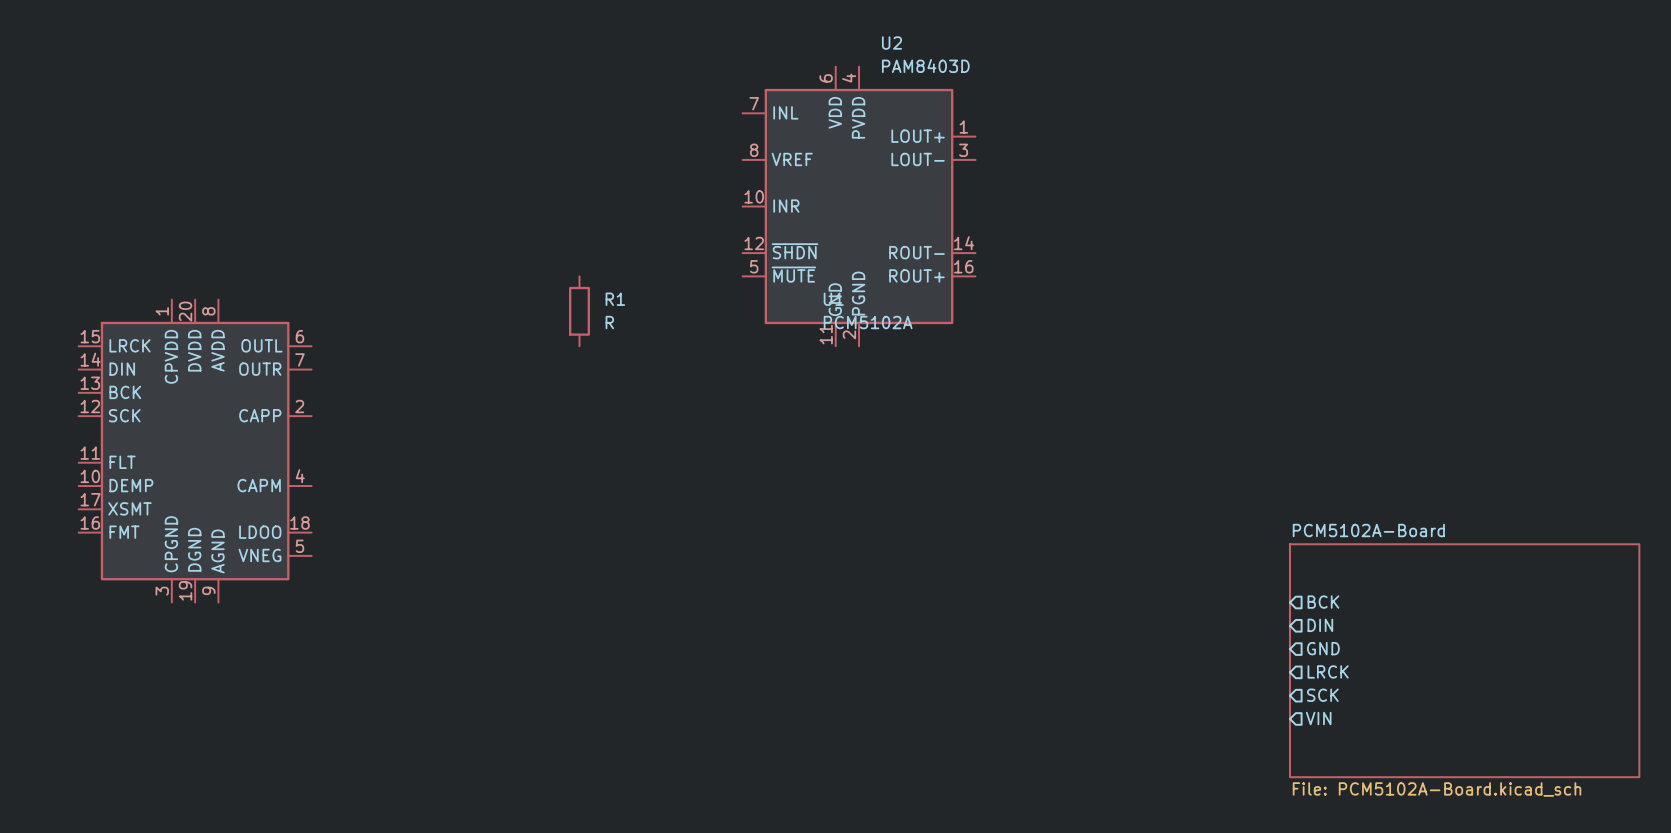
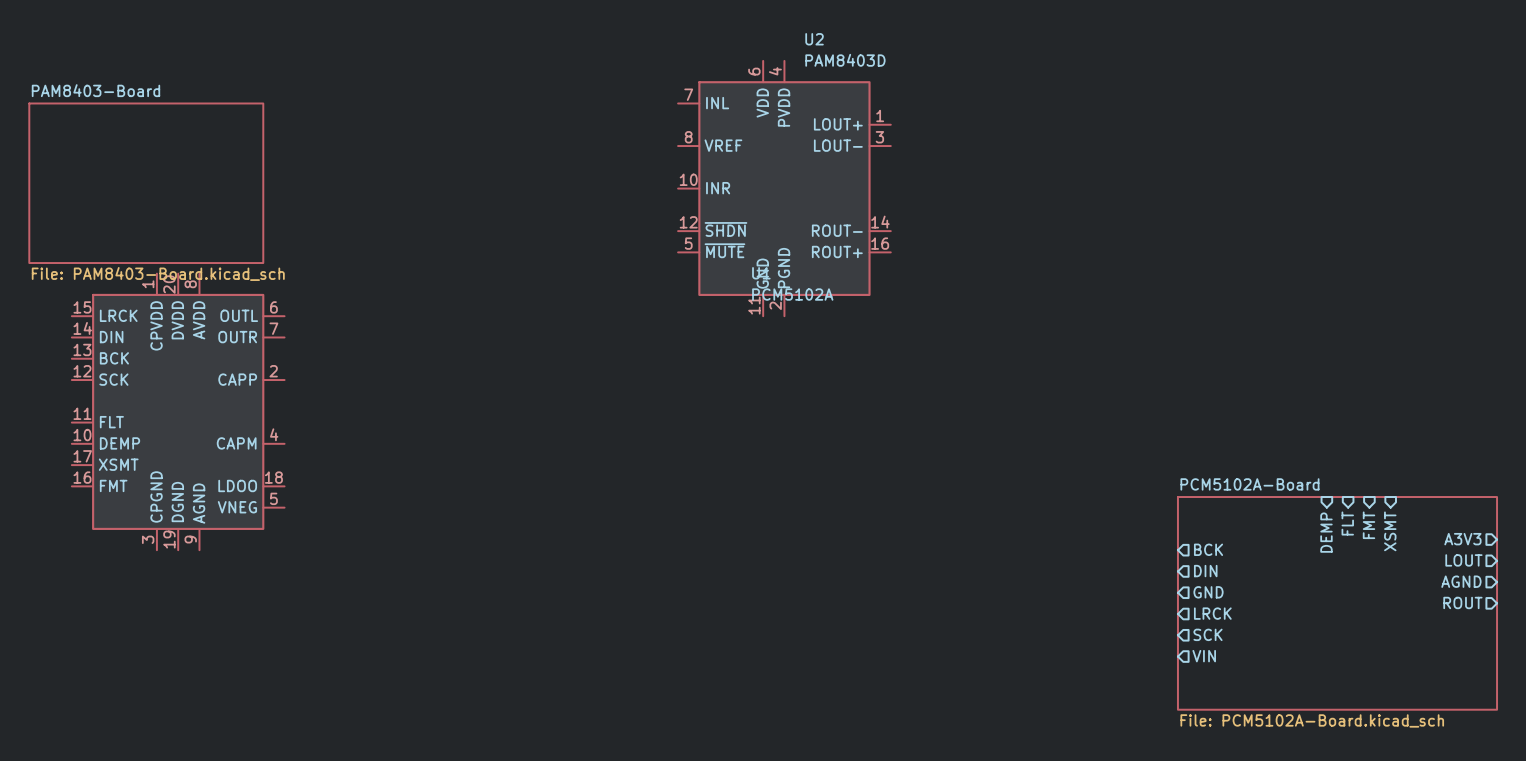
sheet PAM8403-Board: none -> File: PAM8403-Board.kicad_sch (146, 183)
R1: R (579, 311) -> none
sheet pin: none -> FLT (1347, 523)
sheet pin: none -> FMT (1369, 525)
sheet pin: none -> XSMT (1390, 531)
sheet pin: none -> DEMP (1326, 532)
sheet pin: none -> A3V3 (1462, 539)
sheet pin: none -> LOUT (1463, 560)
sheet pin: none -> AGND (1461, 581)
sheet pin: none -> ROUT (1462, 602)

